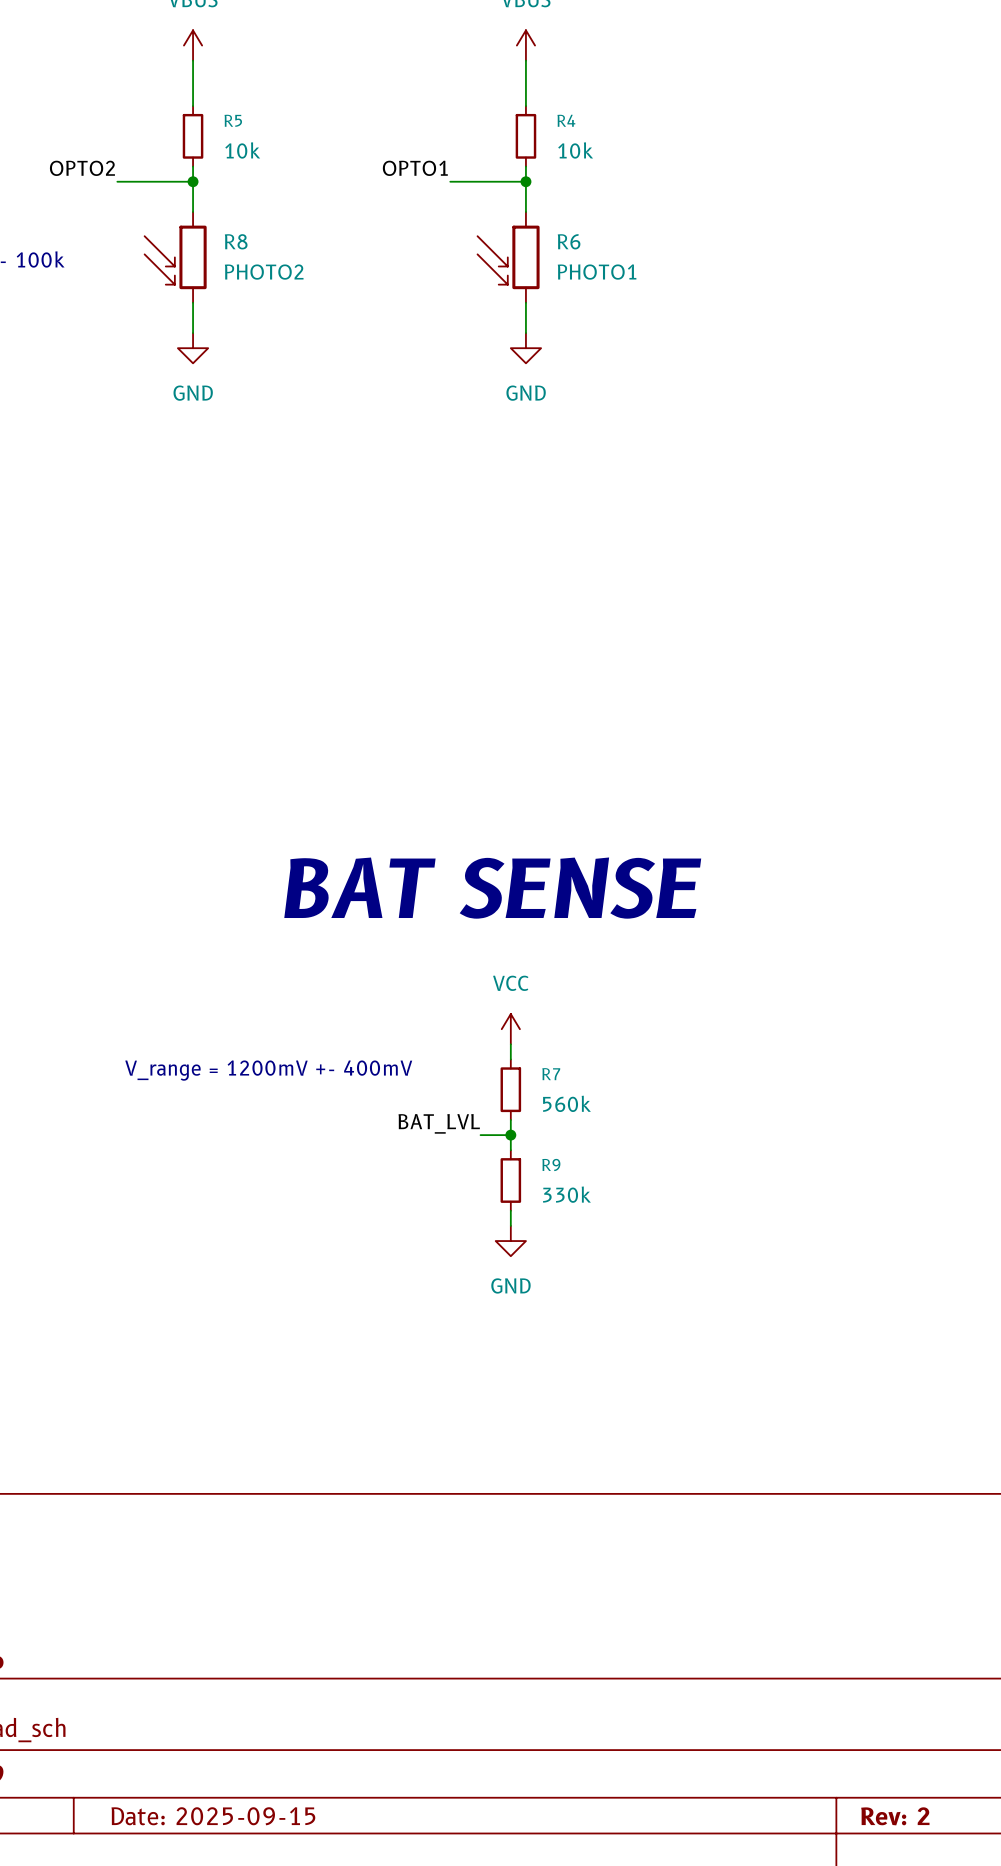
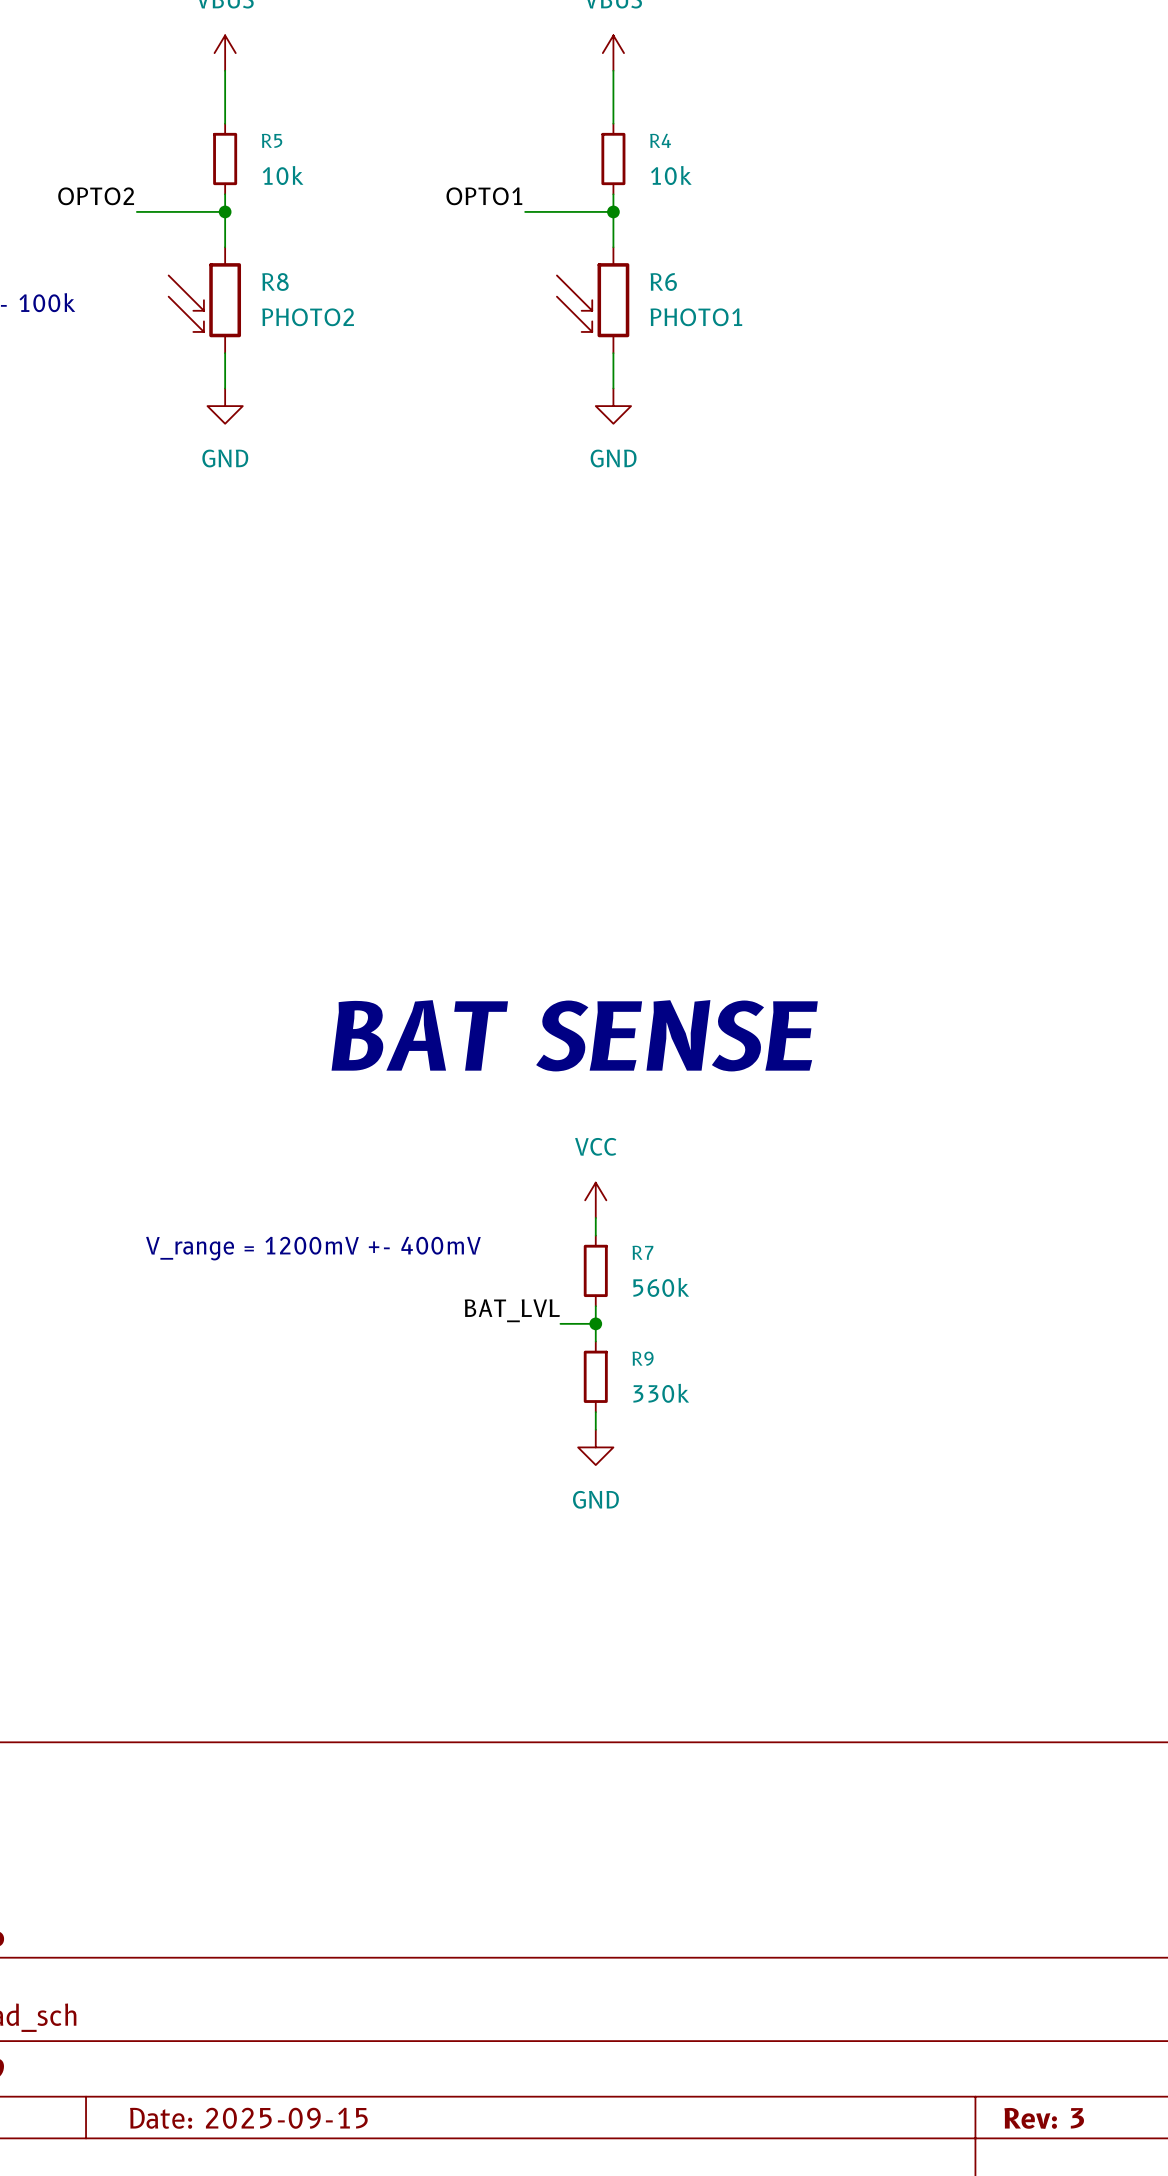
title block: Rev: 2 (895, 1816) -> Rev: 3 (1044, 2118)

